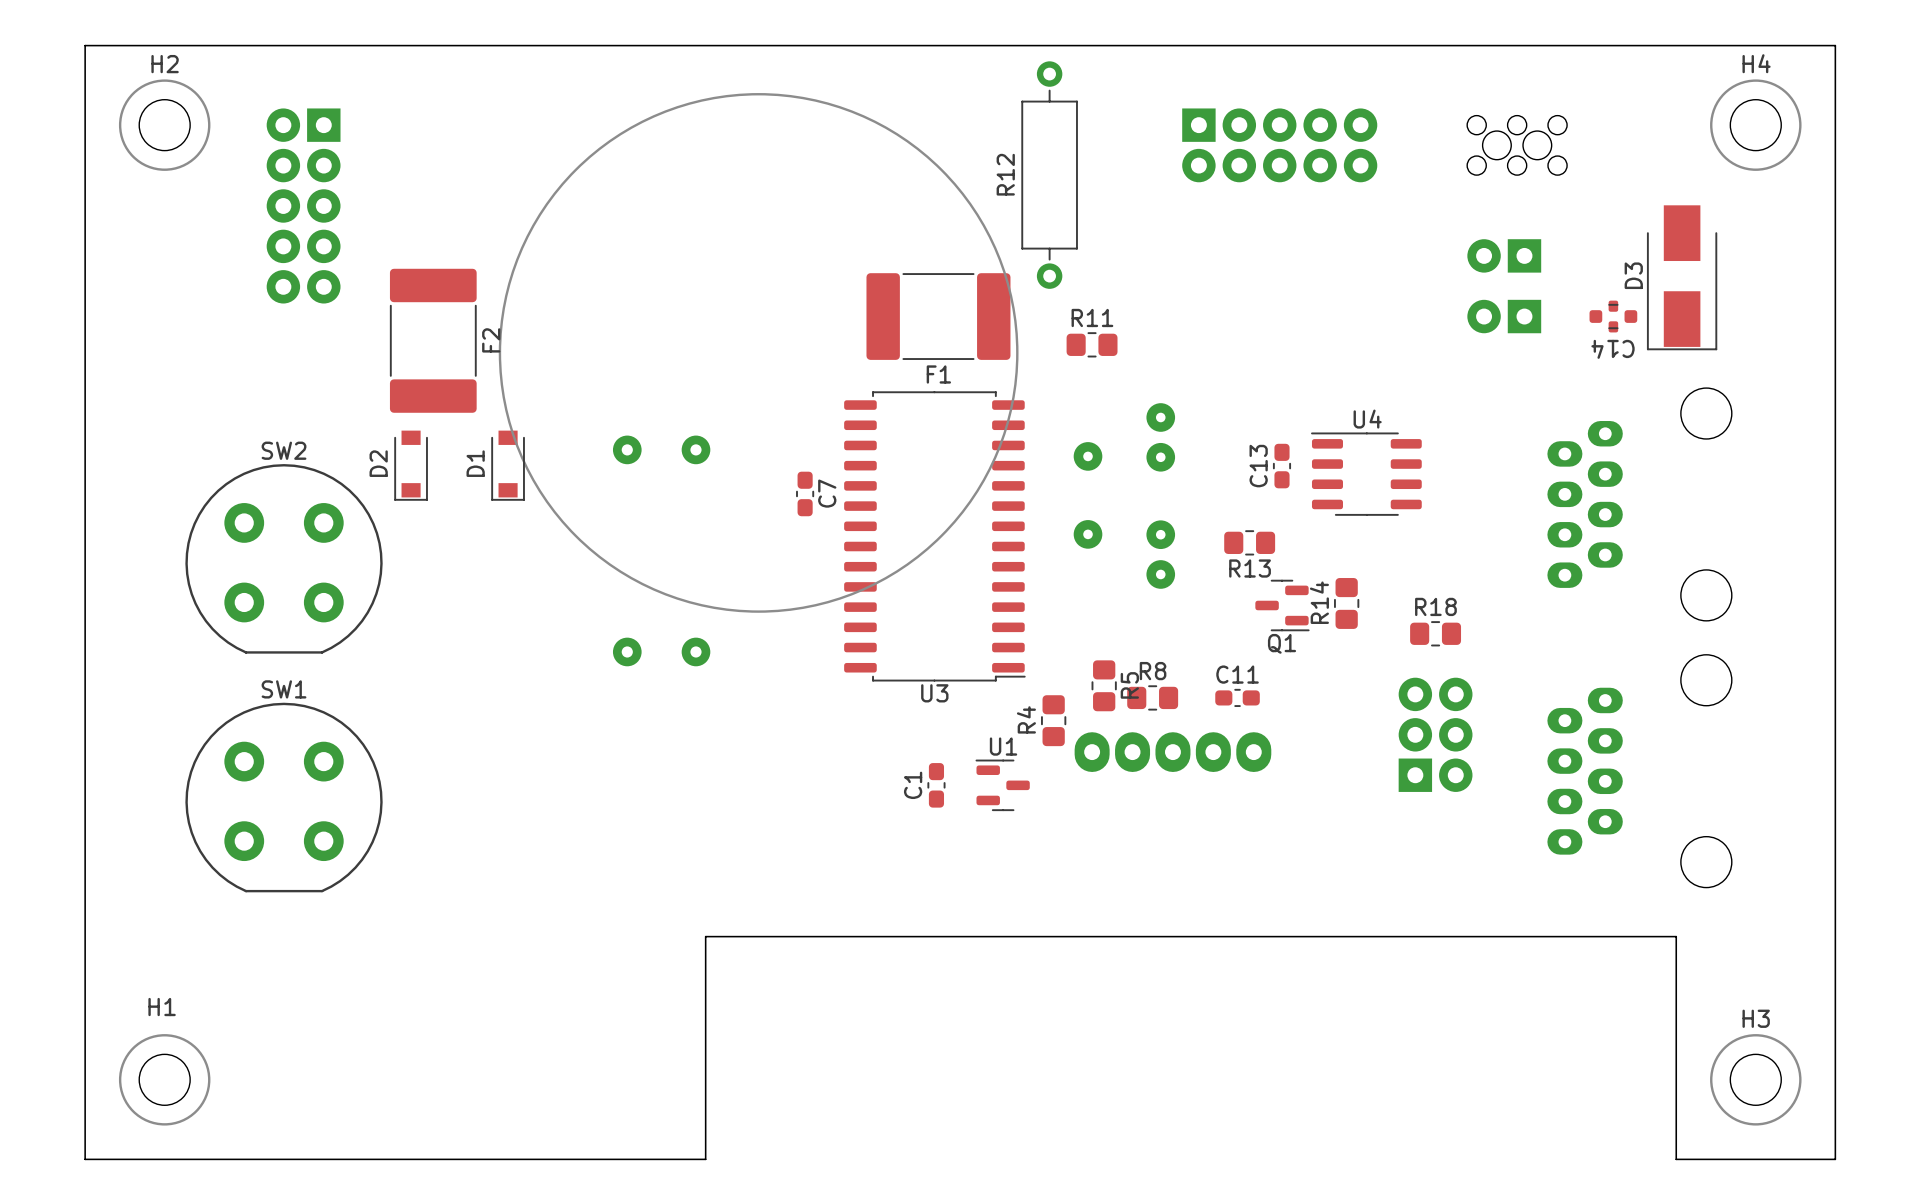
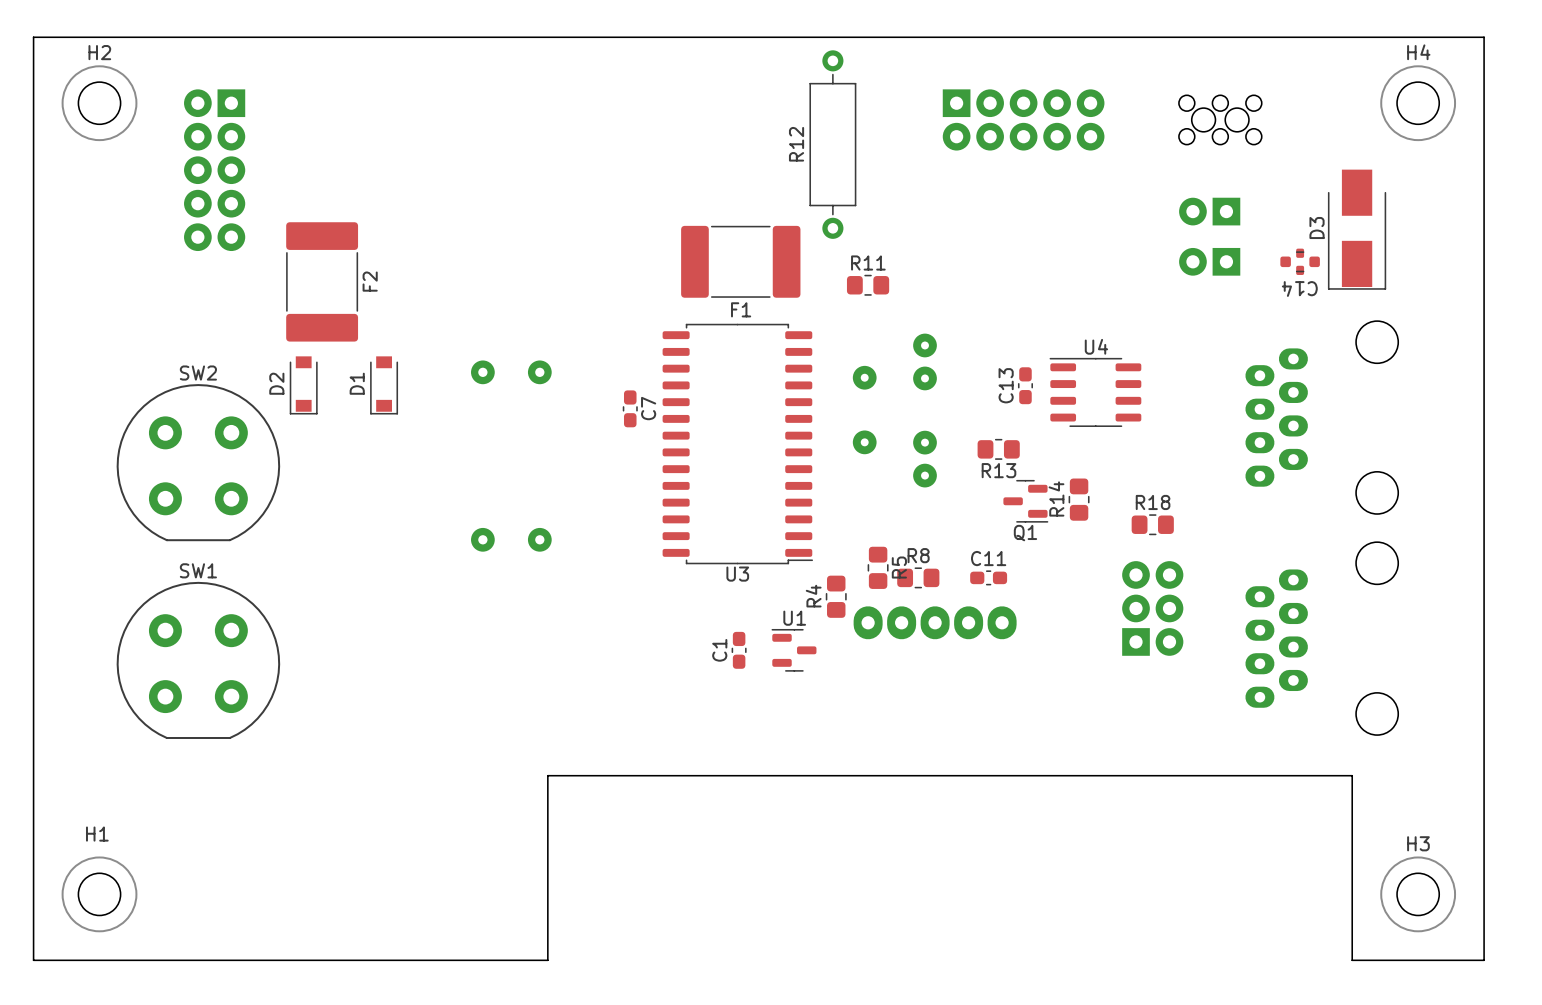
drawing: [498, 93, 1019, 613] -> none

